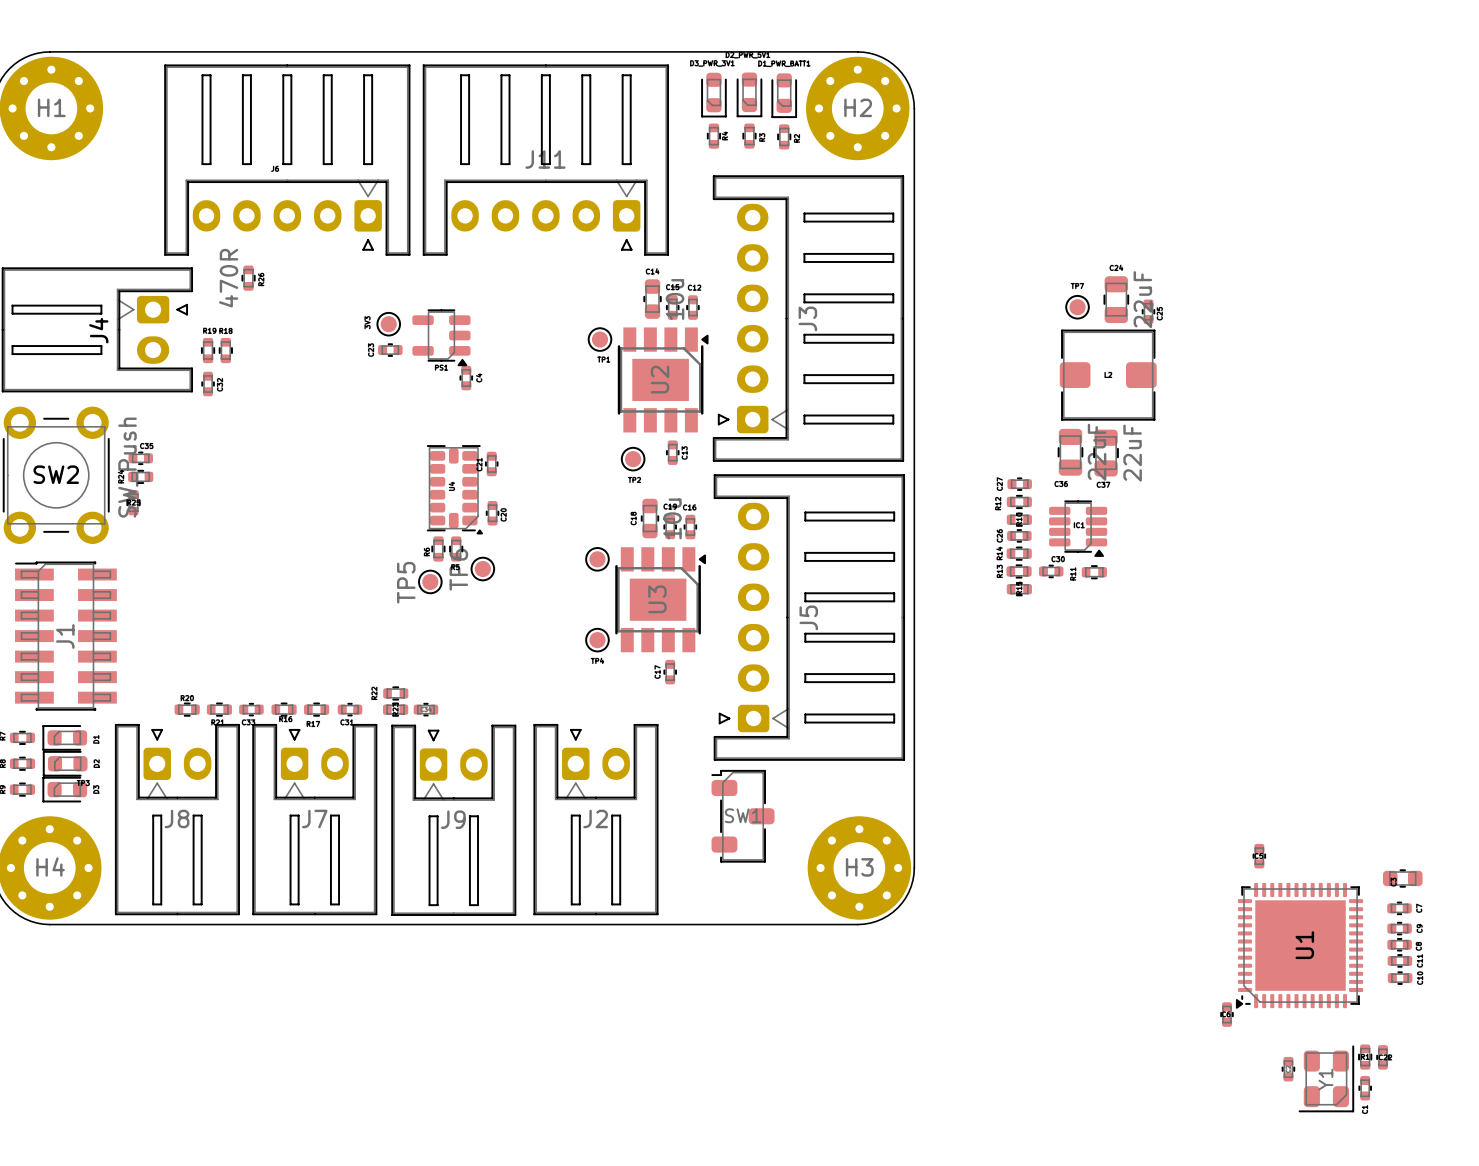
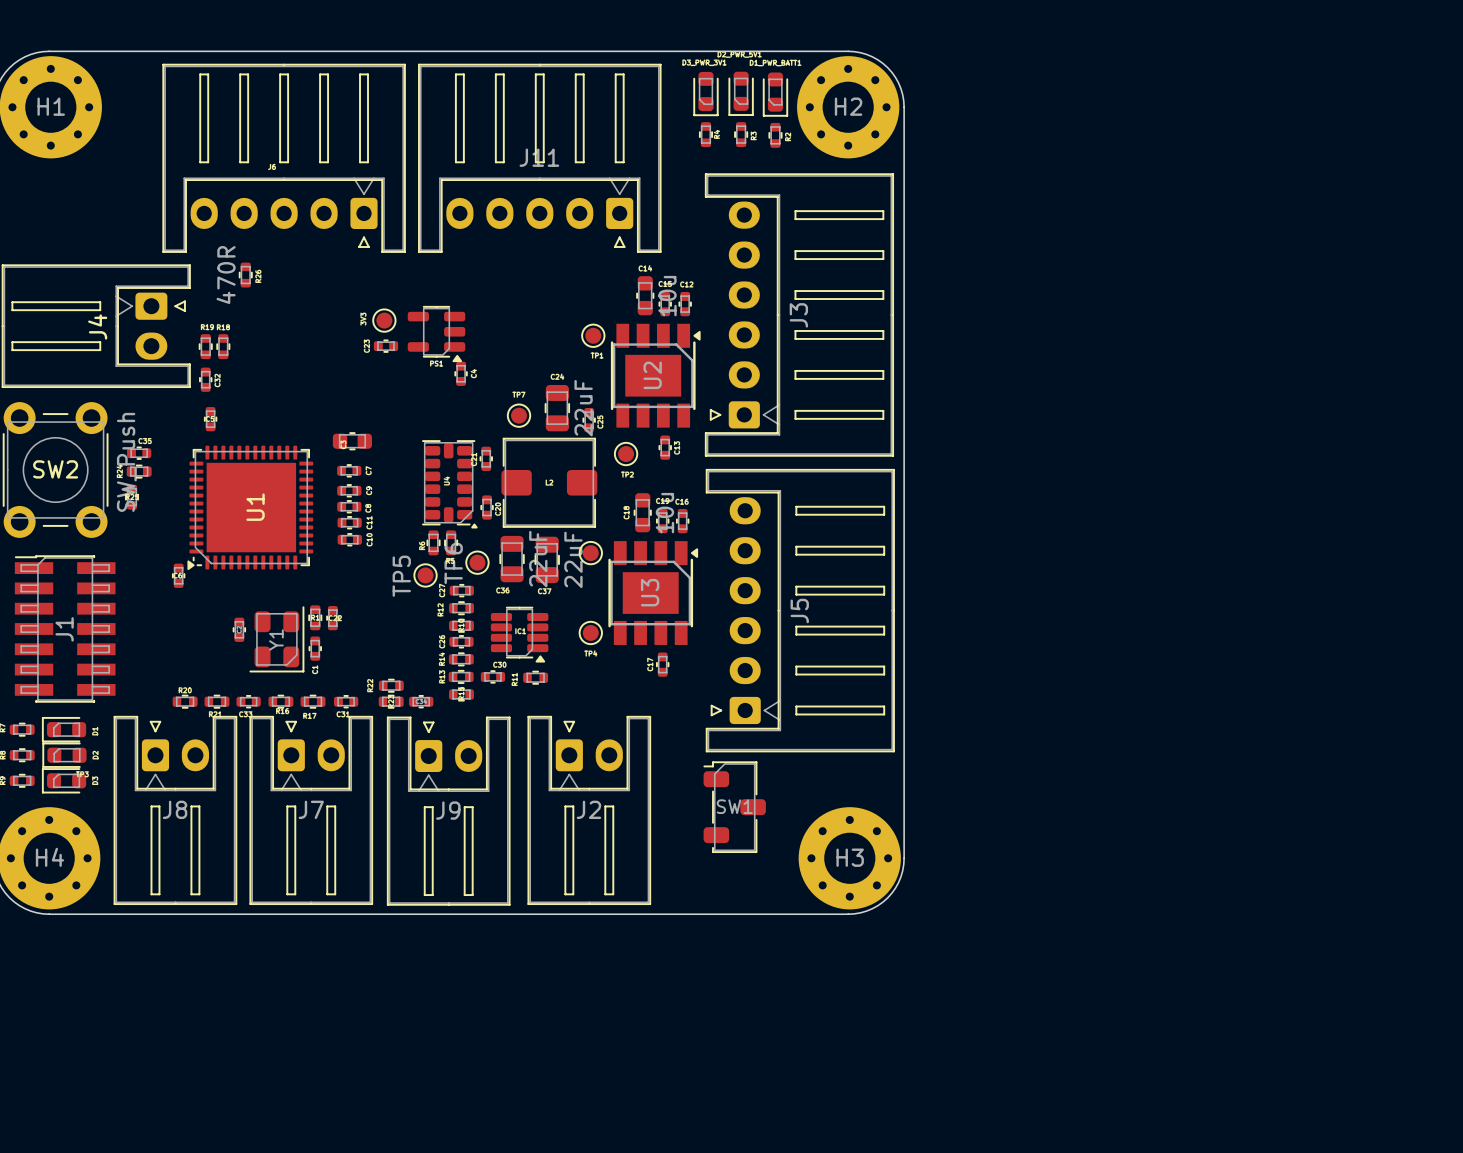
part position: (1116, 299) -> (557, 408)
part position: (1077, 307) -> (519, 415)
part position: (1148, 311) -> (589, 420)
part position: (1108, 375) -> (549, 482)
part position: (1070, 452) -> (512, 559)
part position: (1106, 453) -> (547, 559)
part position: (1019, 484) -> (461, 590)
part position: (1019, 501) -> (461, 608)
part position: (1019, 519) -> (461, 625)
part position: (1078, 528) -> (519, 634)
part position: (1019, 535) -> (461, 641)
part position: (1019, 553) -> (461, 659)
part position: (1019, 571) -> (461, 676)
part position: (1051, 571) -> (492, 676)
part position: (1094, 572) -> (535, 677)
part position: (1019, 589) -> (461, 694)
part position: (1259, 856) -> (210, 419)
part position: (1402, 878) -> (352, 441)
part position: (1399, 908) -> (349, 470)
part position: (1399, 928) -> (349, 490)
part position: (1399, 944) -> (349, 506)
U1 position: (1299, 945) -> (250, 507)
part position: (1399, 960) -> (349, 522)
part position: (1400, 978) -> (349, 539)
part position: (1227, 1014) -> (178, 575)
part position: (1365, 1057) -> (315, 617)
part position: (1382, 1057) -> (332, 618)
part position: (1288, 1069) -> (239, 629)
Y1 position: (1326, 1078) -> (276, 639)
part position: (1365, 1088) -> (315, 648)

